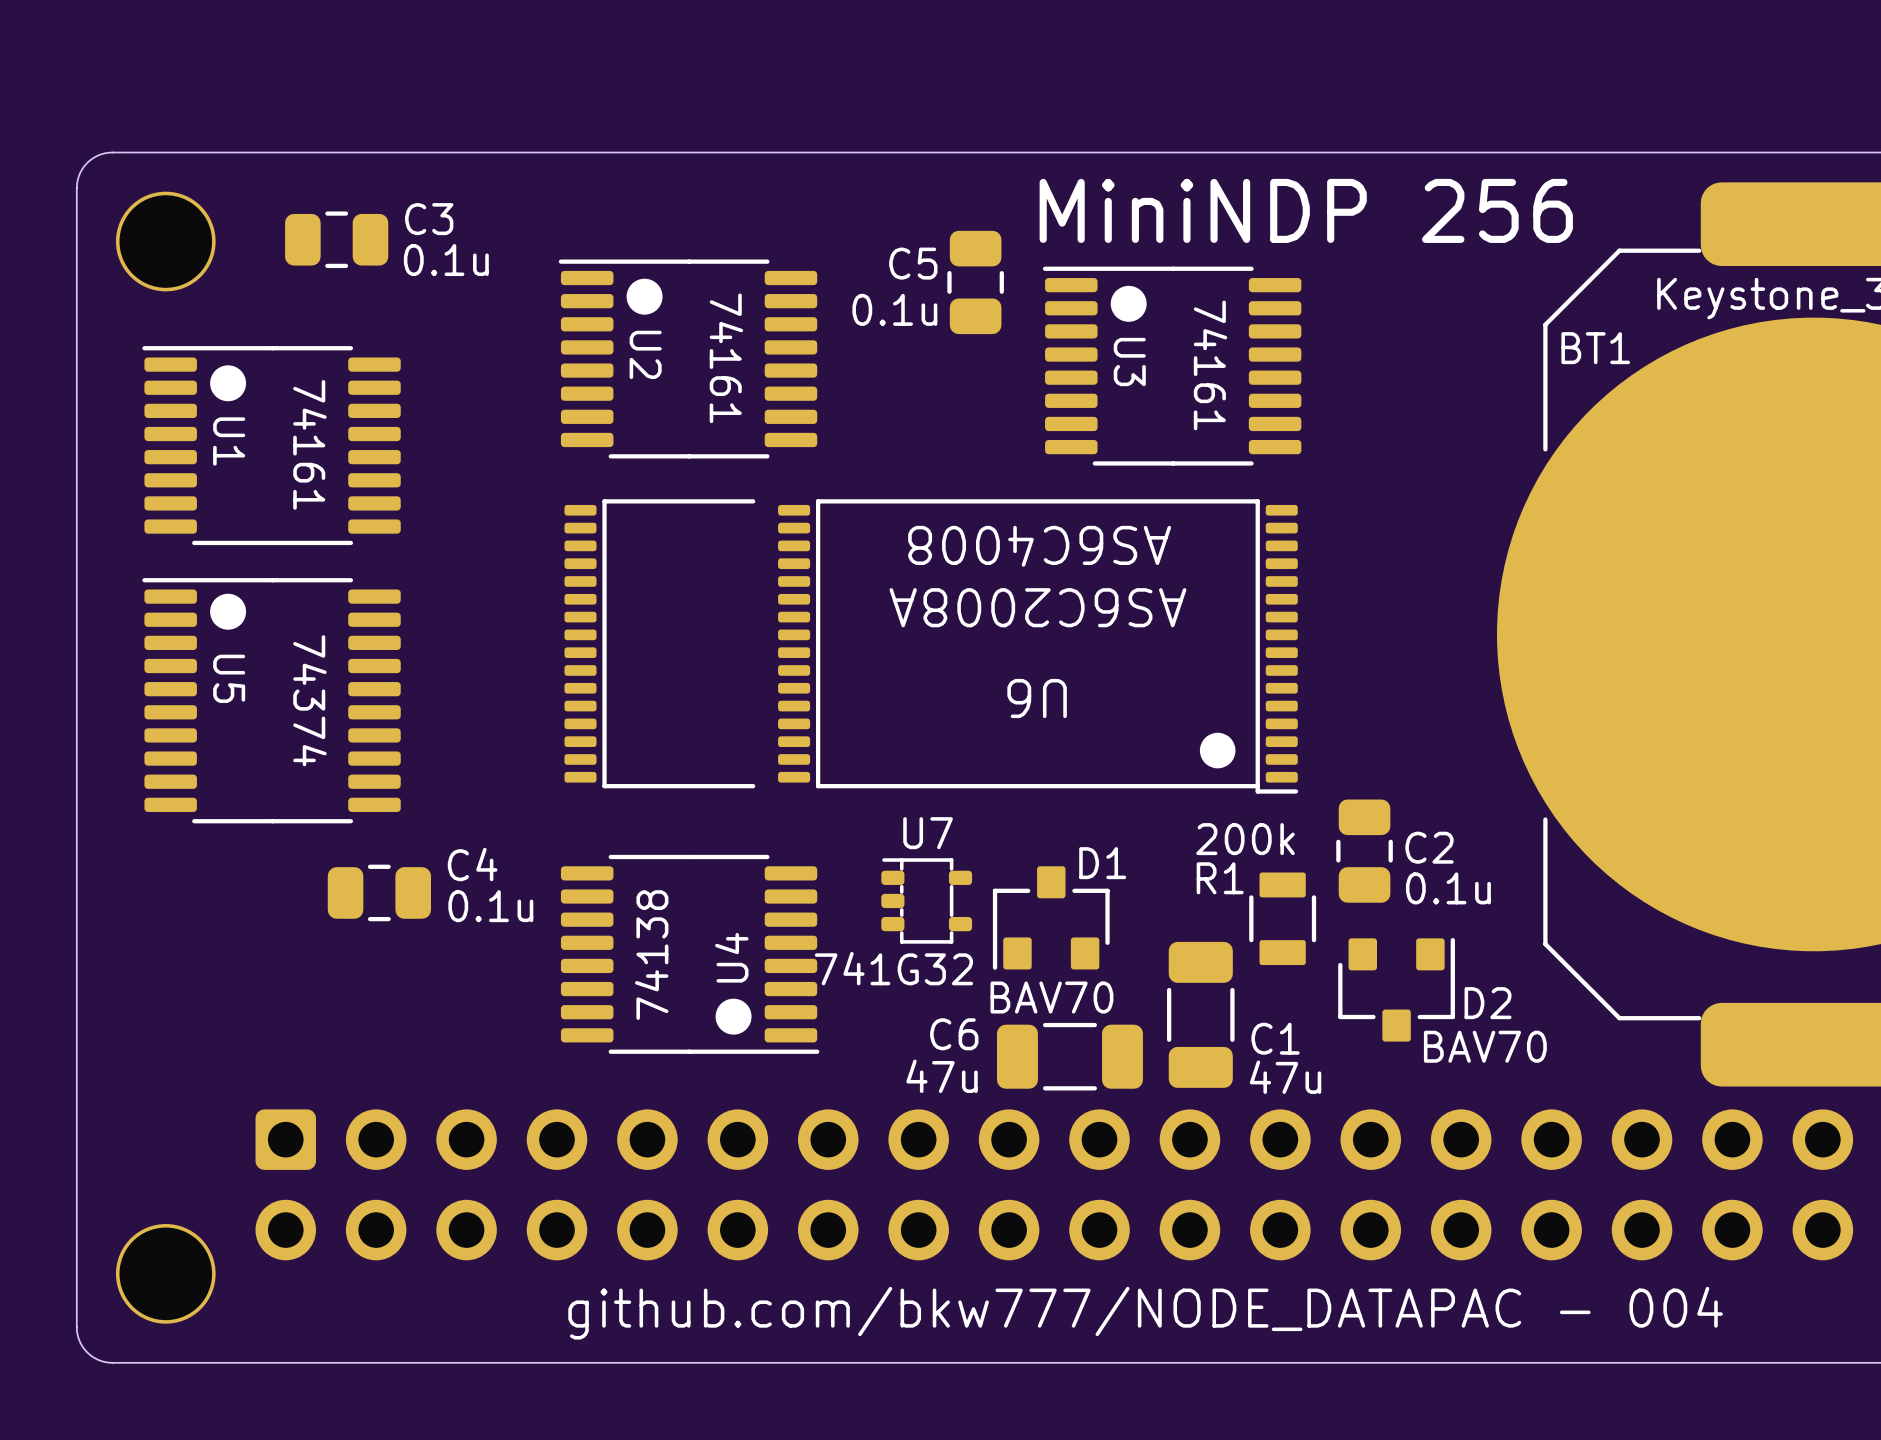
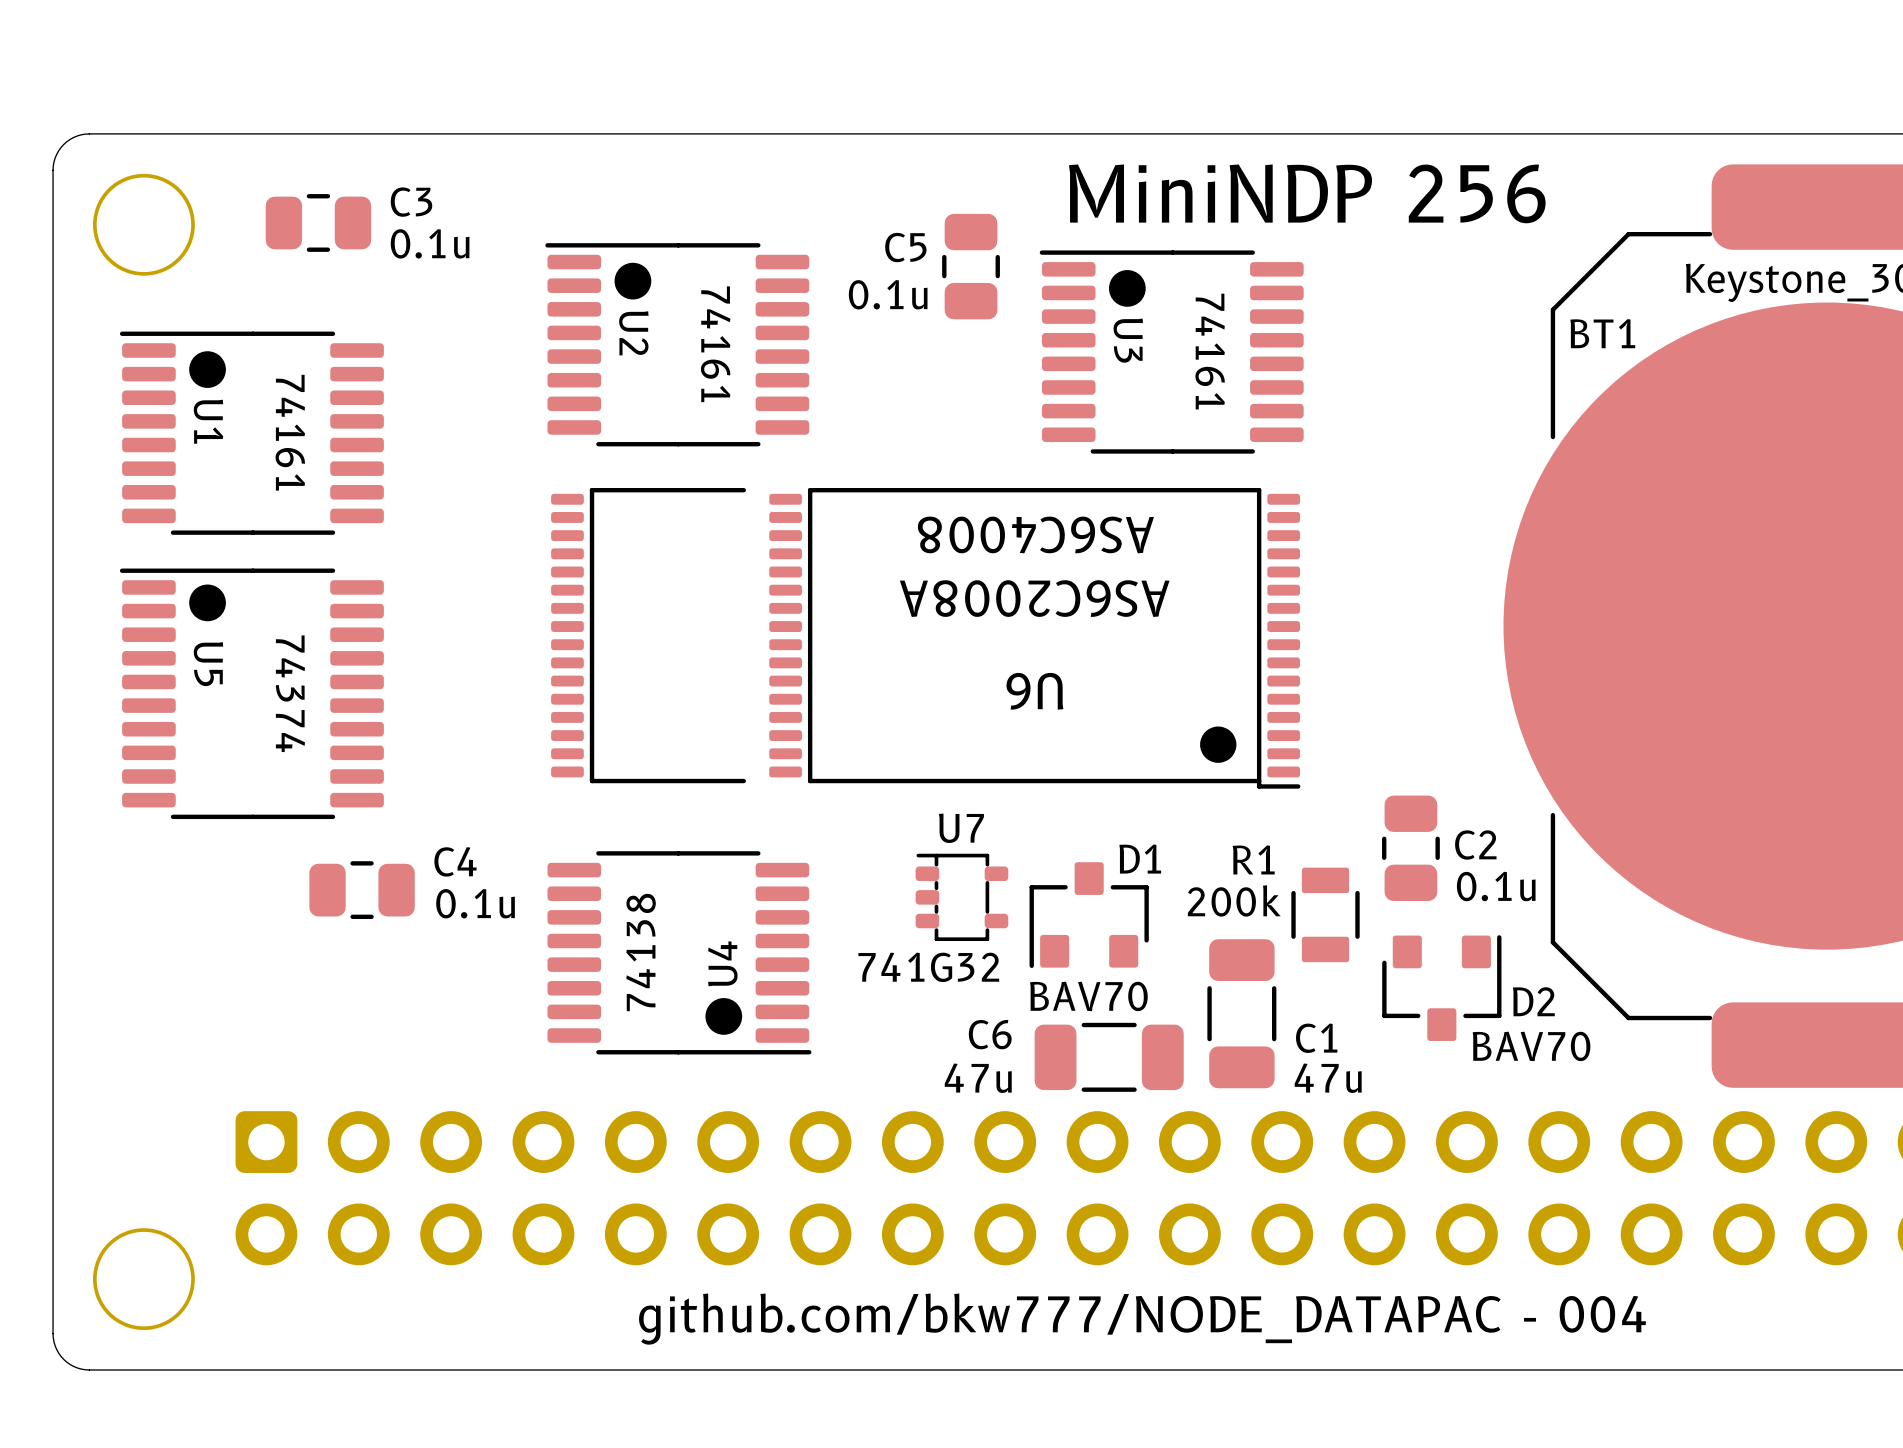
R1 value position: 200k (1245, 839) -> 200k (1234, 900)
C2 position: (1364, 851) -> (1410, 848)
R1 name position: R1 (1220, 878) -> R1 (1253, 859)
U7 position: (926, 900) -> (961, 897)
D1 position: (1051, 918) -> (1089, 915)
R1 position: (1282, 918) -> (1325, 914)
D2 position: (1396, 989) -> (1441, 988)
C1 position: (1200, 1014) -> (1241, 1013)
C6 position: (1069, 1056) -> (1109, 1057)

